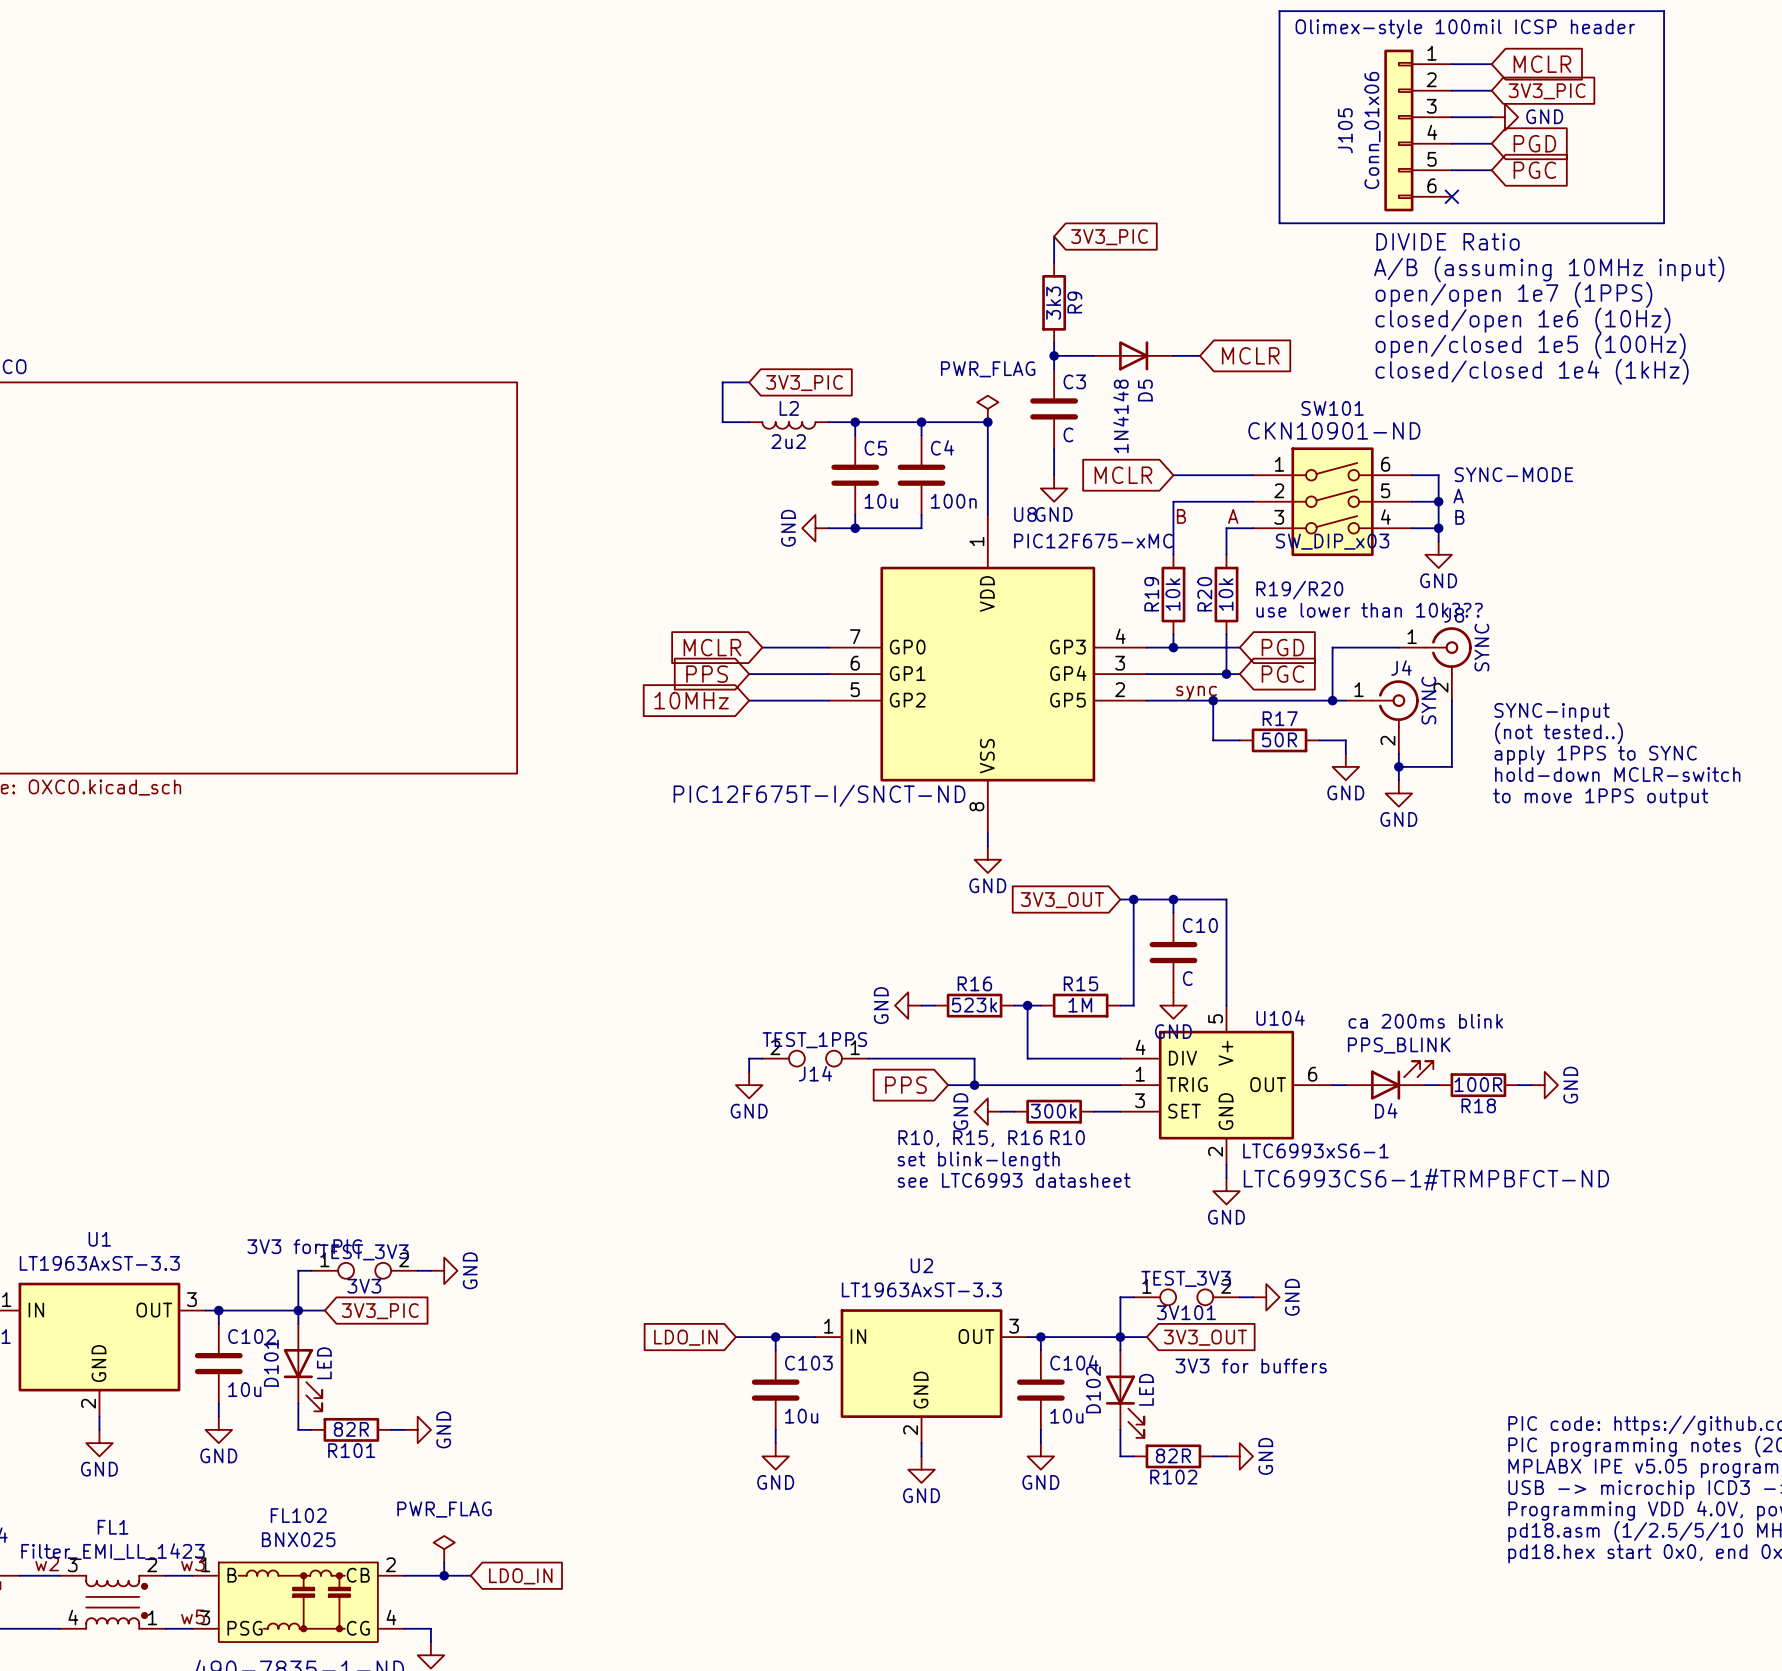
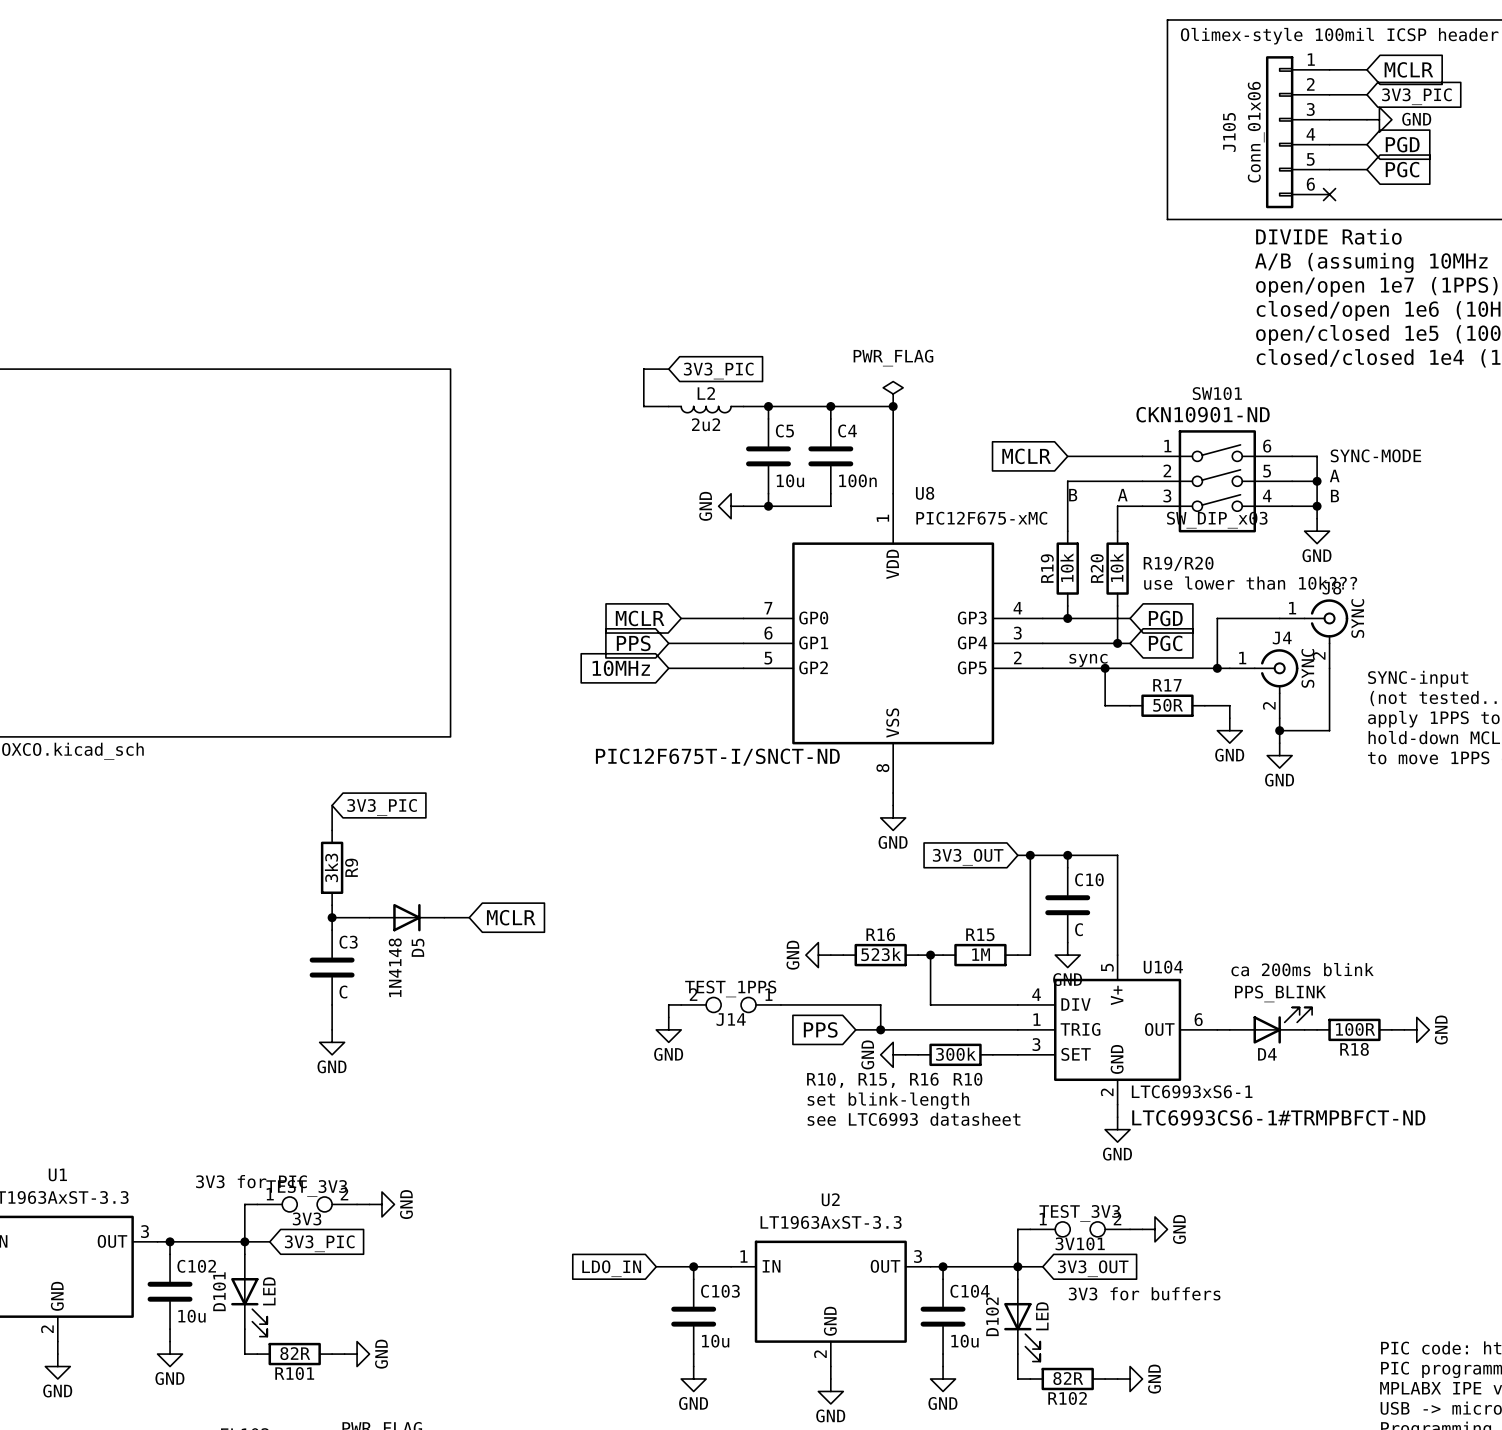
wire: (1054, 236) (1054, 263) -> none
global label: 3V3_PIC (1109, 237) -> none
R9 position: (1054, 302) -> (332, 867)
wire: (1054, 342) (1054, 369) -> none
wire: (1054, 355) (1093, 355) -> none
junction: (1054, 355) -> none
D5 position: (1133, 355) -> (406, 917)
wire: (1173, 355) (1199, 355) -> none
global label: MCLR (1250, 355) -> none
C3 position: (1054, 408) -> (332, 967)
wire: (1054, 448) (1054, 475) -> none
power symbol: GND (1054, 488) -> none
wire: none -> (332, 805) (332, 830)
global label: none -> 3V3_PIC (382, 807)
wire: none -> (332, 905) (332, 930)
wire: none -> (332, 917) (369, 917)
junction: none -> (332, 917)
wire: none -> (444, 917) (469, 917)
global label: none -> MCLR (511, 917)
wire: none -> (332, 1004) (332, 1029)
power symbol: none -> GND (332, 1042)

